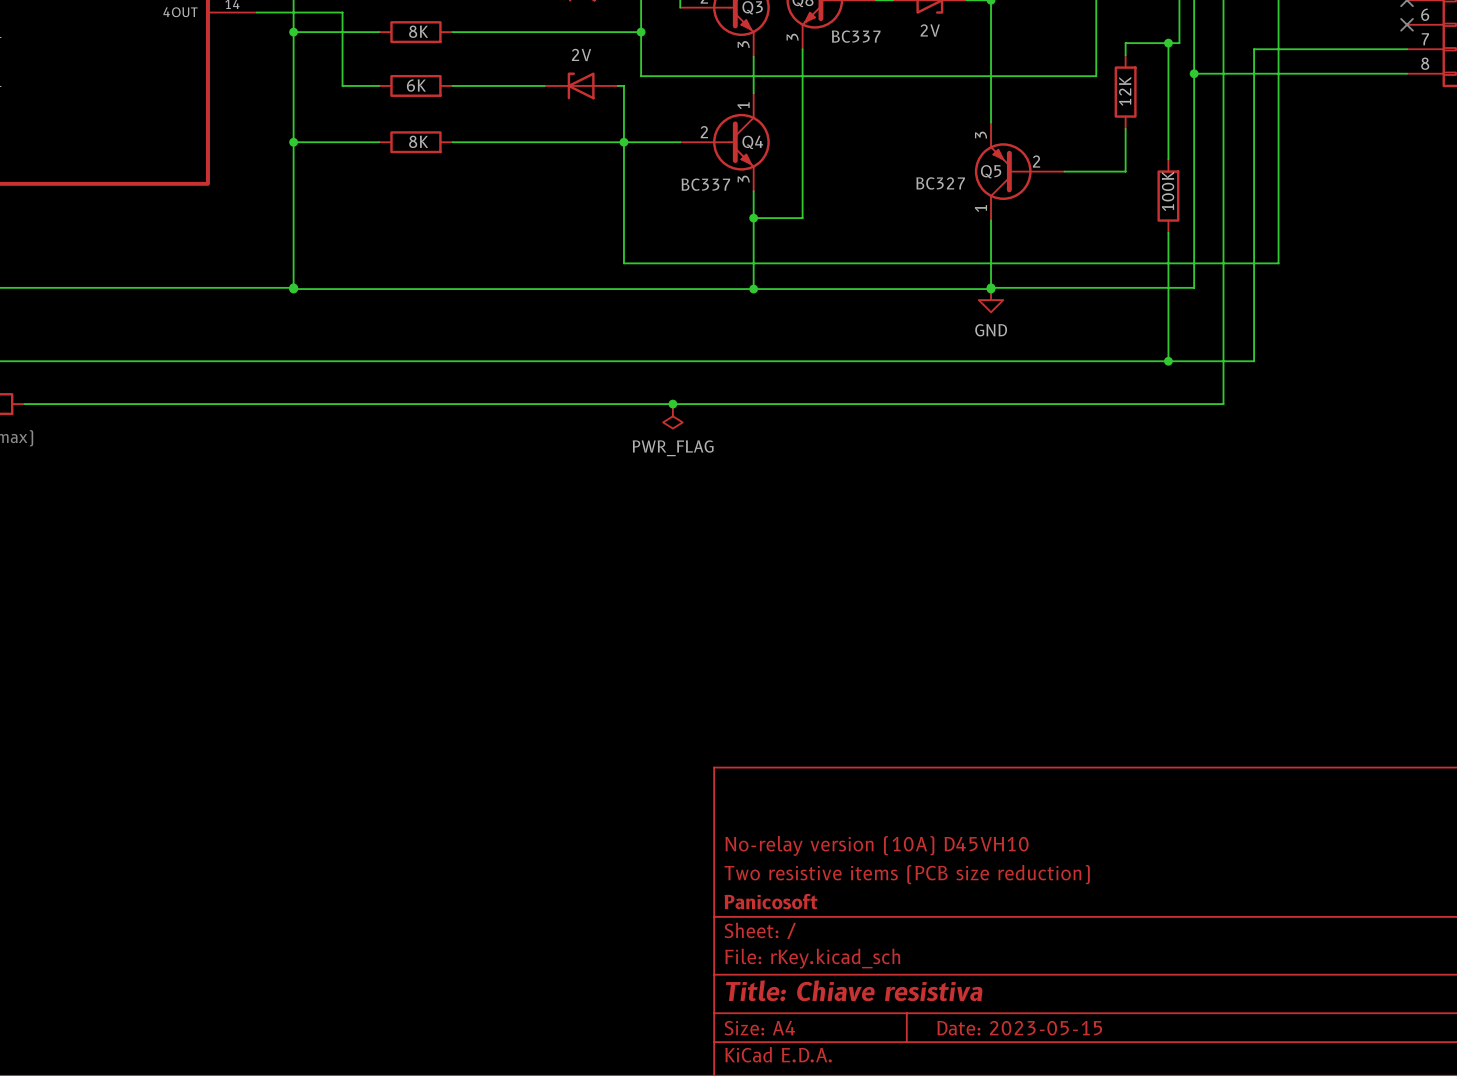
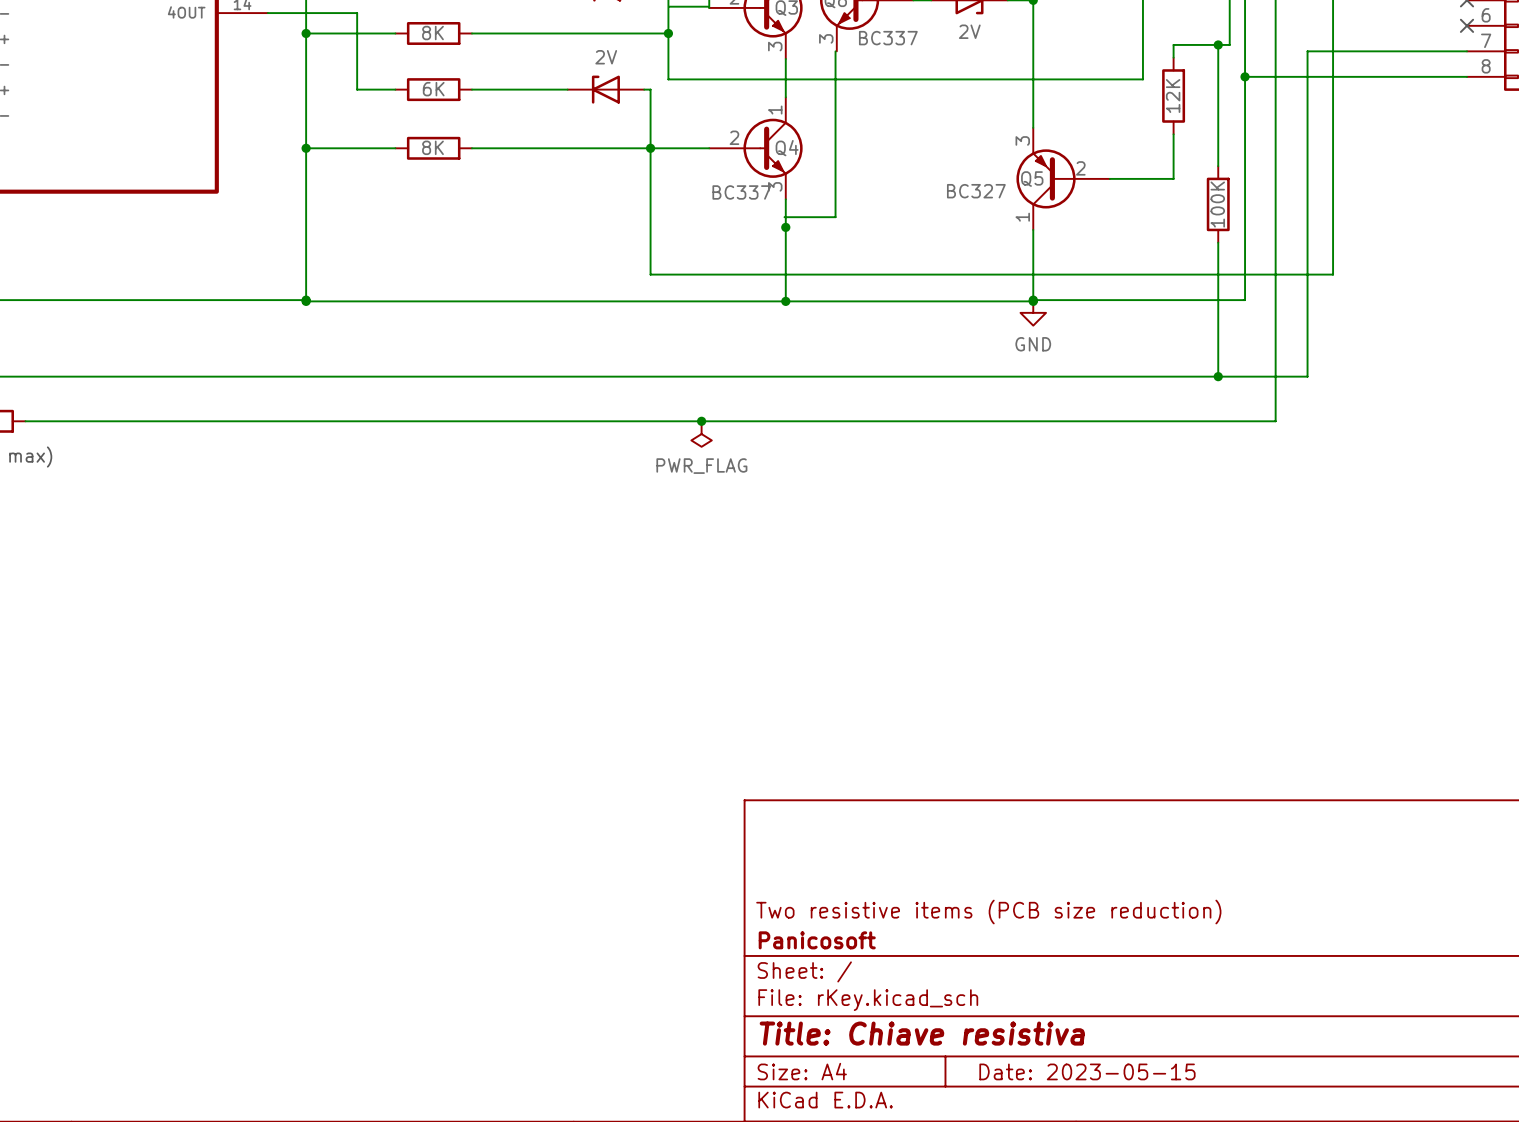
wire: none -> (669, 6) (707, 6)
wire: none -> (835, 51) (835, 217) (784, 217)
wire: (802, 49) (802, 218) (753, 218) -> none
title block: No-relay version (10A) D45VH10 (876, 845) -> none

